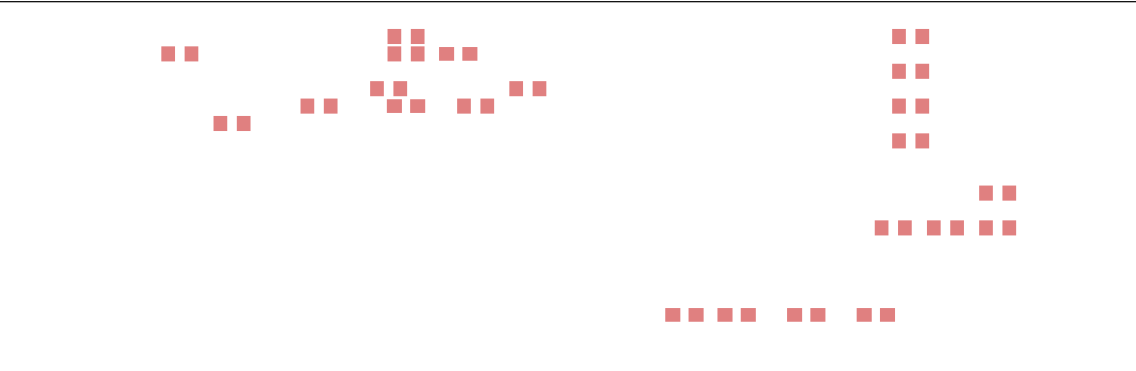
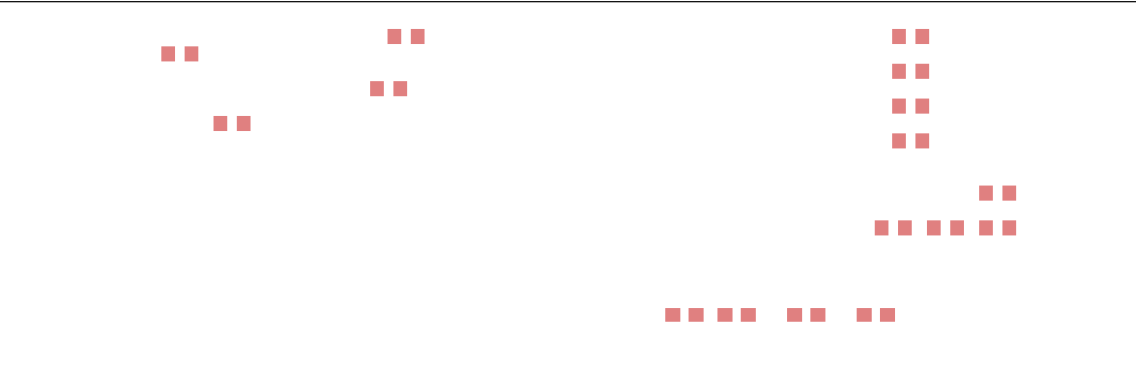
part: (406, 53) -> none
part: (458, 53) -> none
part: (527, 88) -> none
part: (319, 106) -> none
part: (406, 106) -> none
part: (475, 106) -> none

